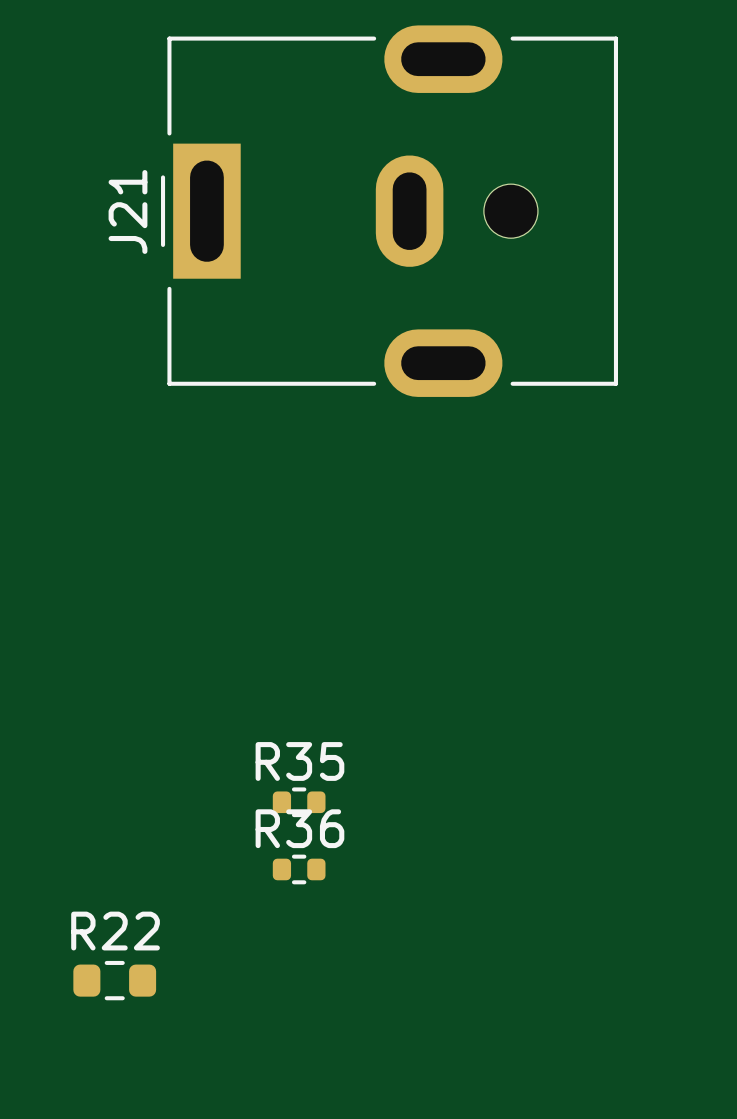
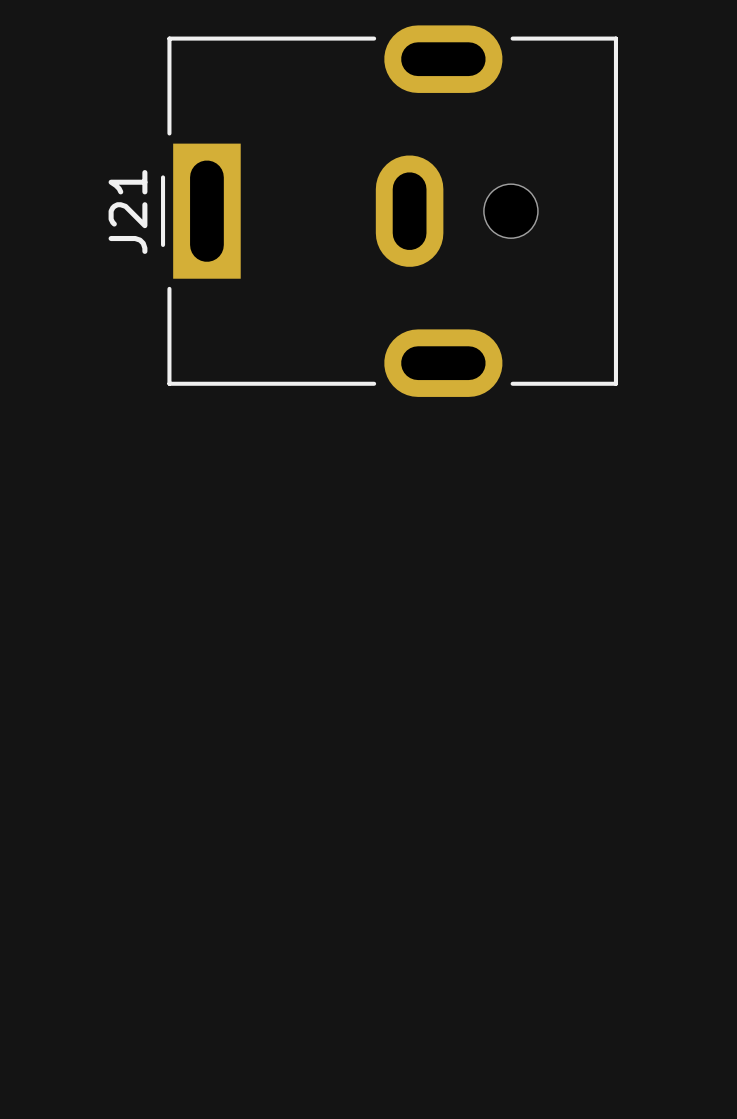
R35: (299, 802) -> none
R36: (299, 869) -> none
R22: (114, 980) -> none

